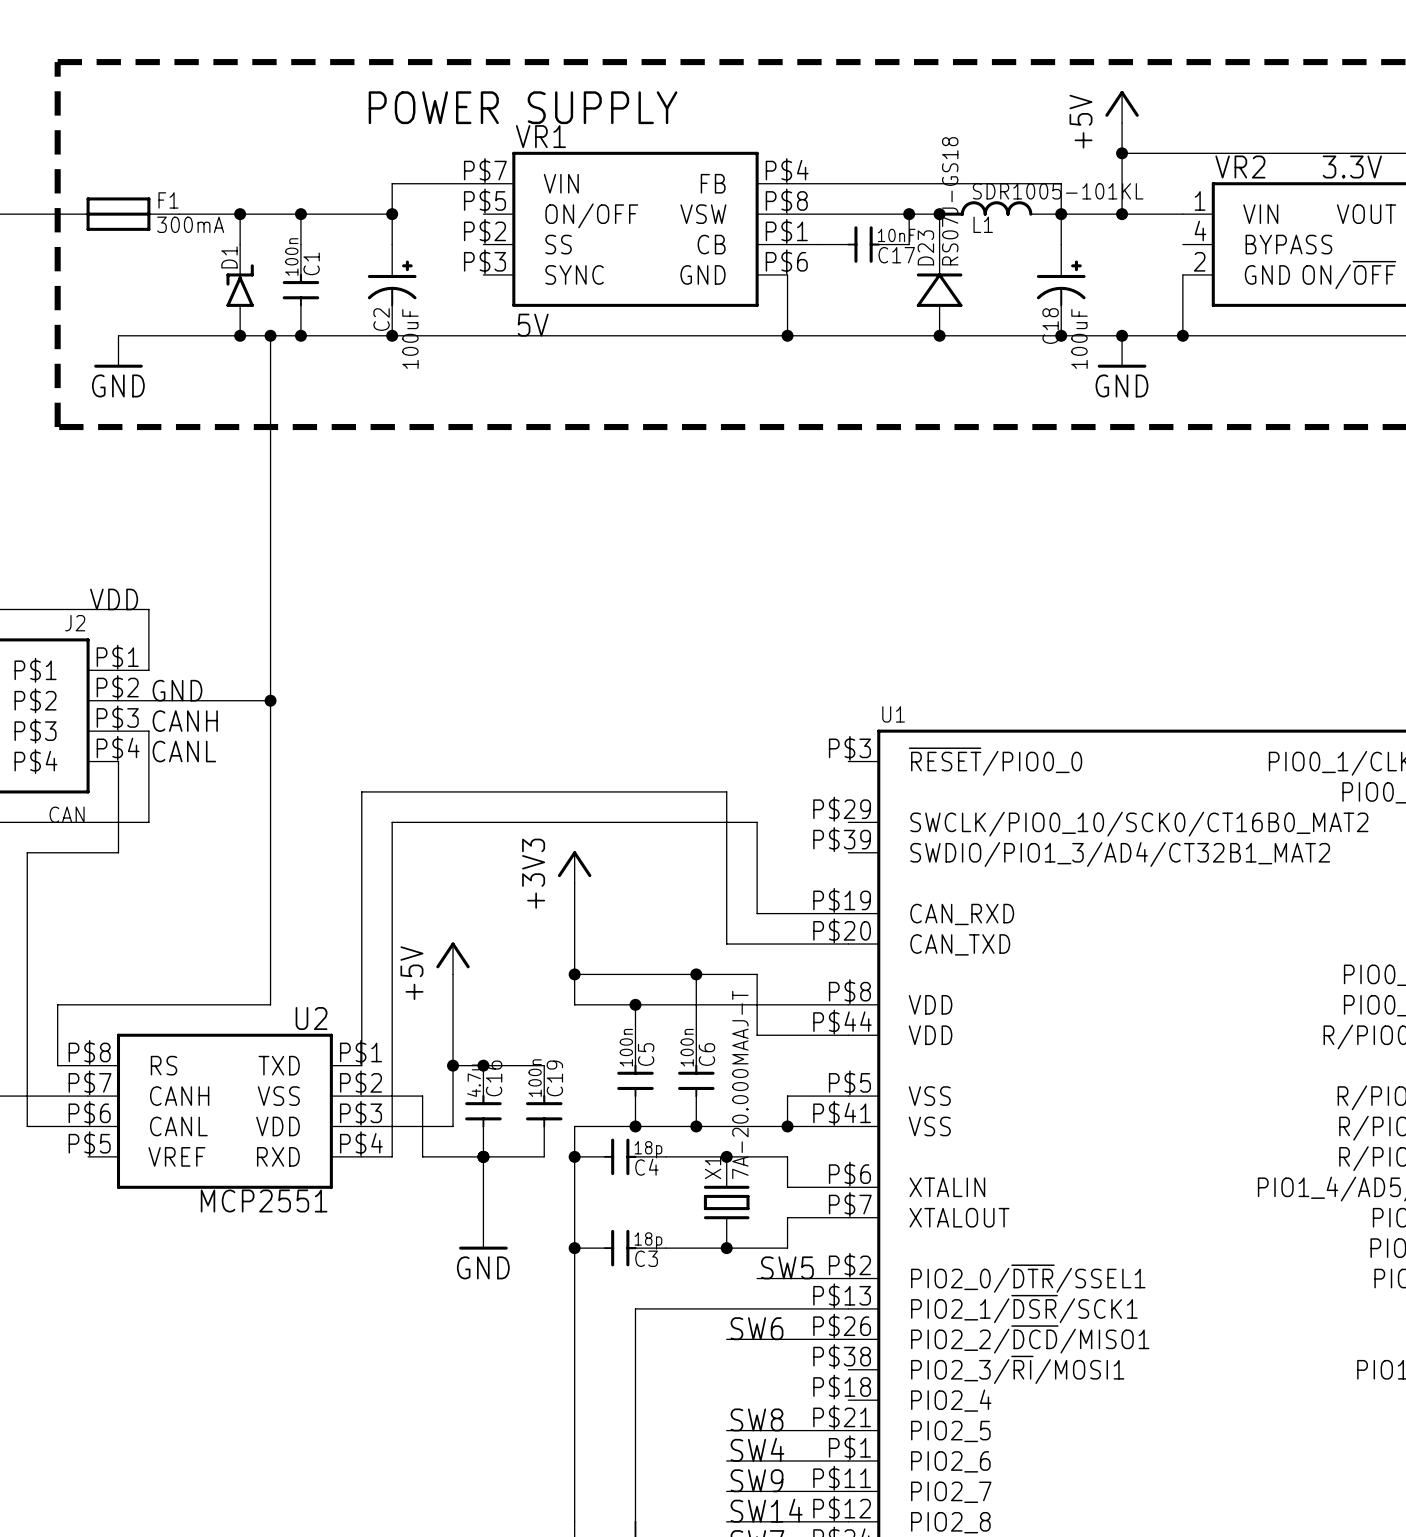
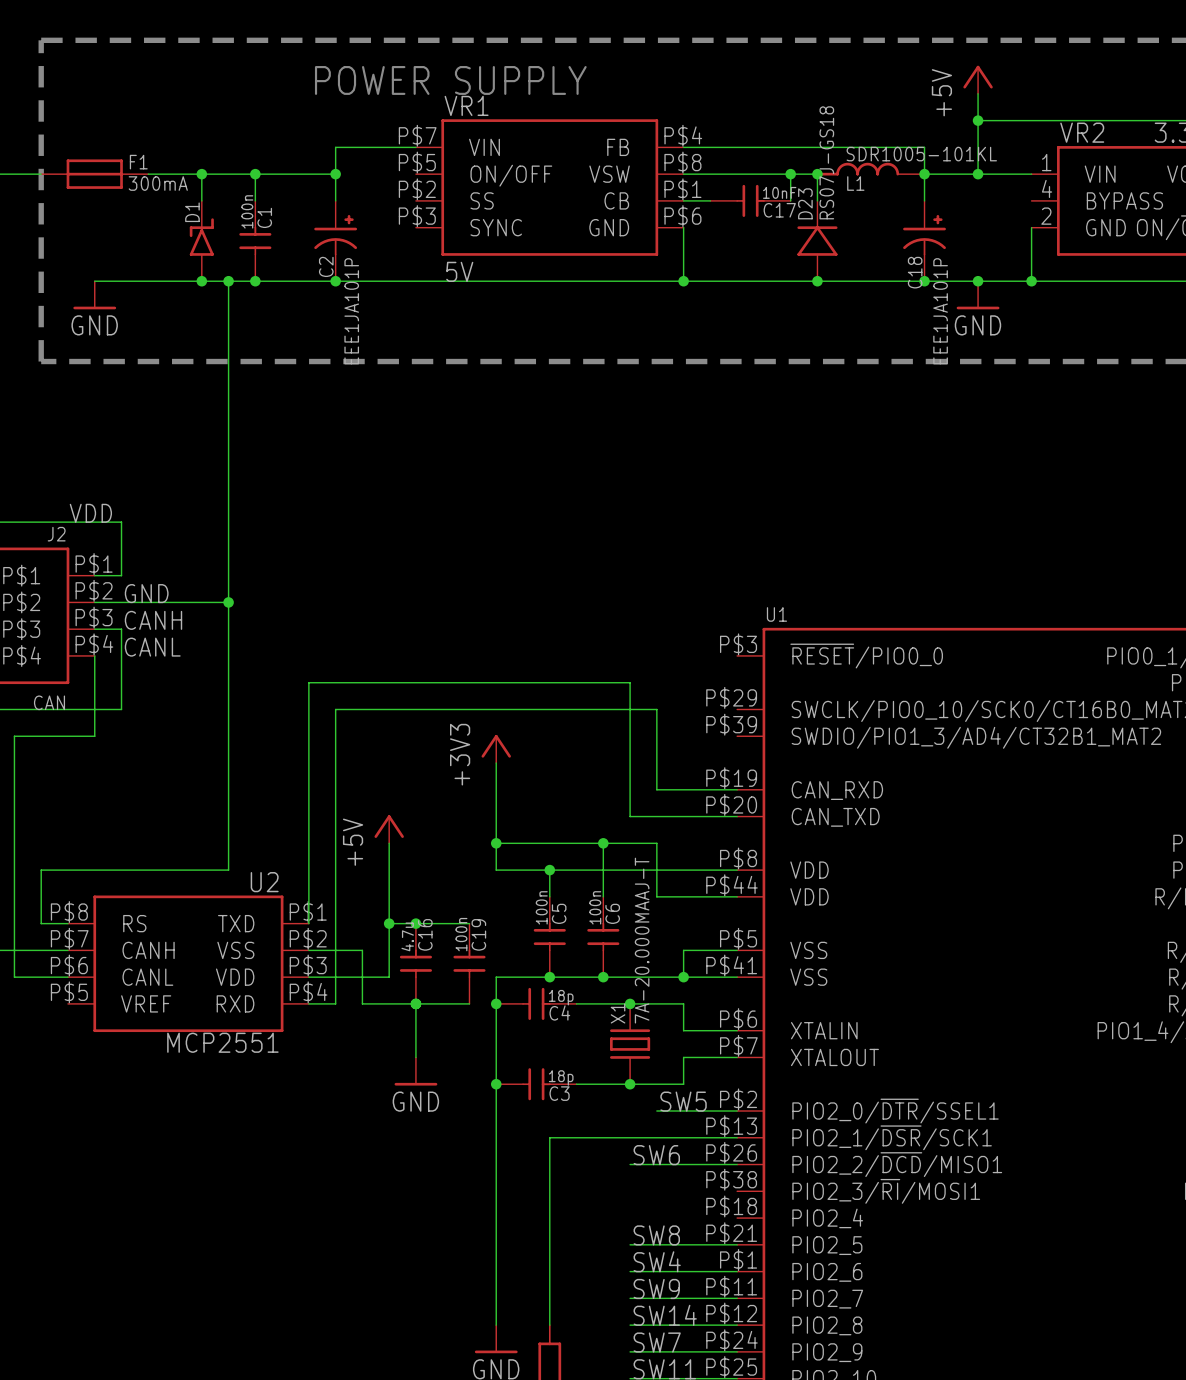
C2 value: 100uF (410, 338) -> EEE1JA101P (351, 311)
C18 value: 100uF (1079, 338) -> EEE1JA101P (940, 311)

